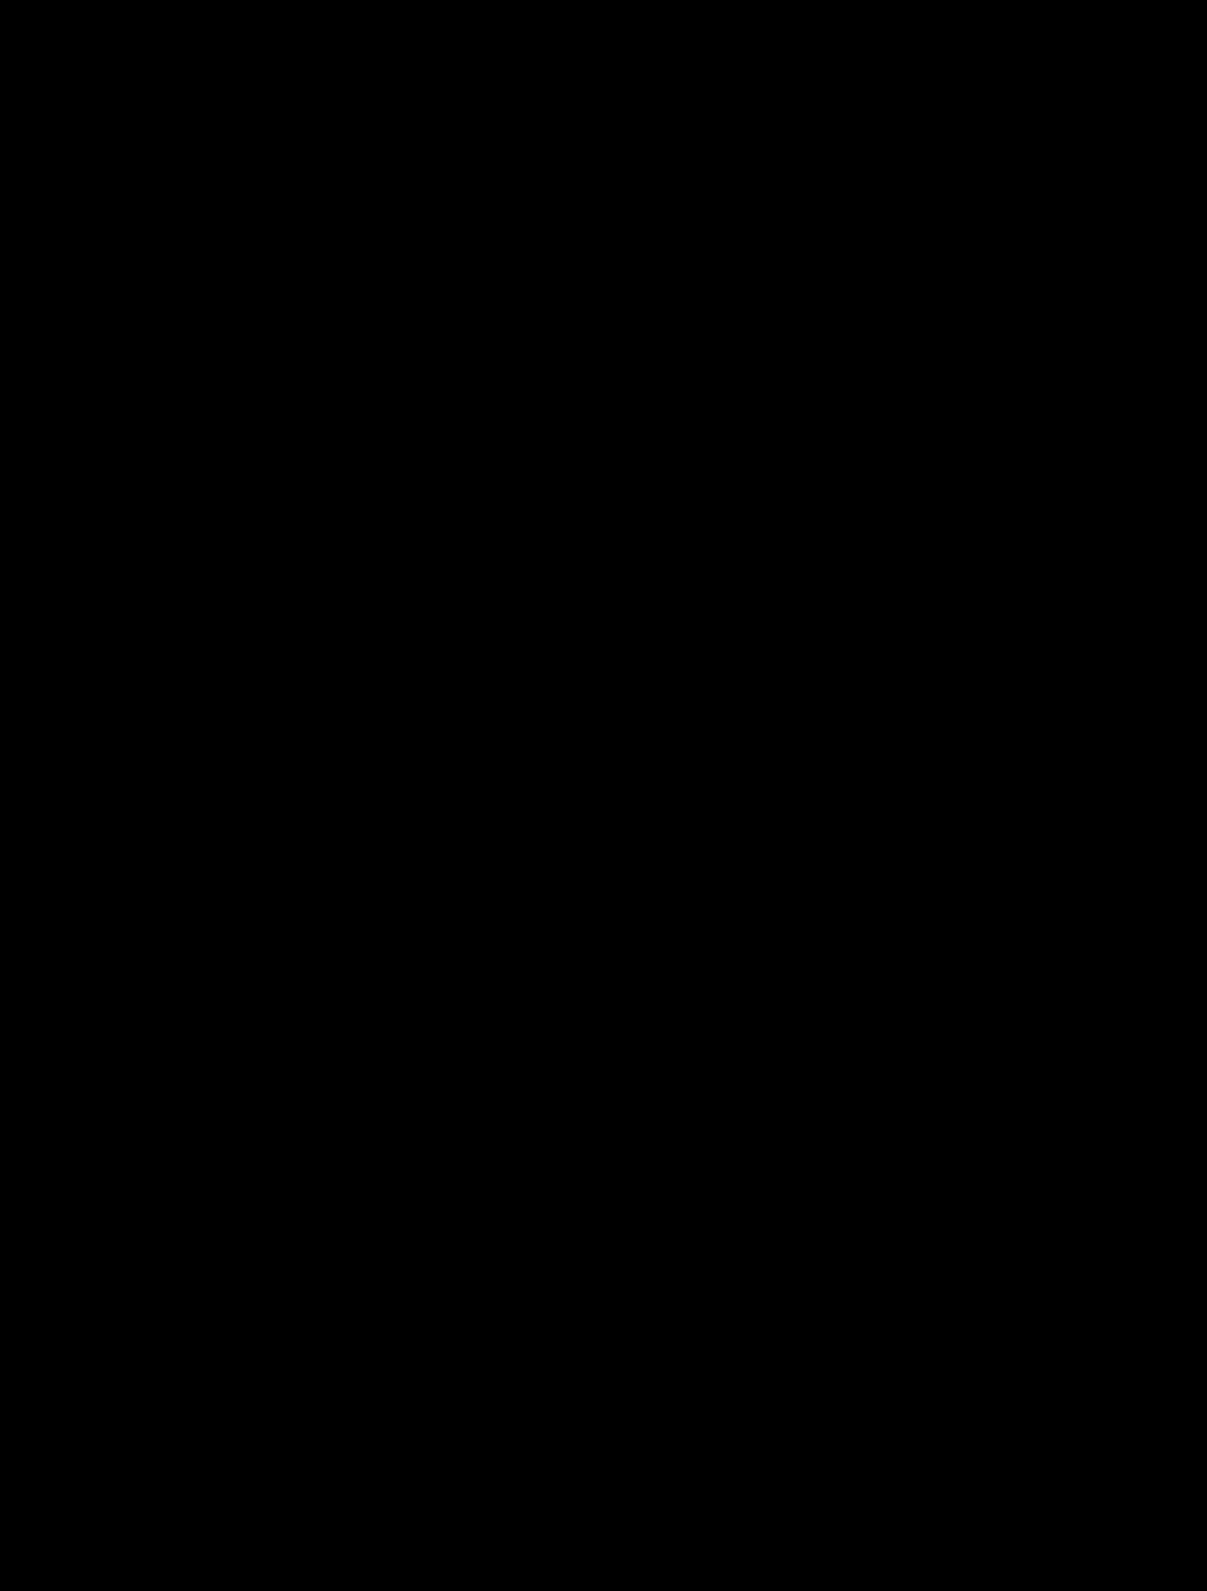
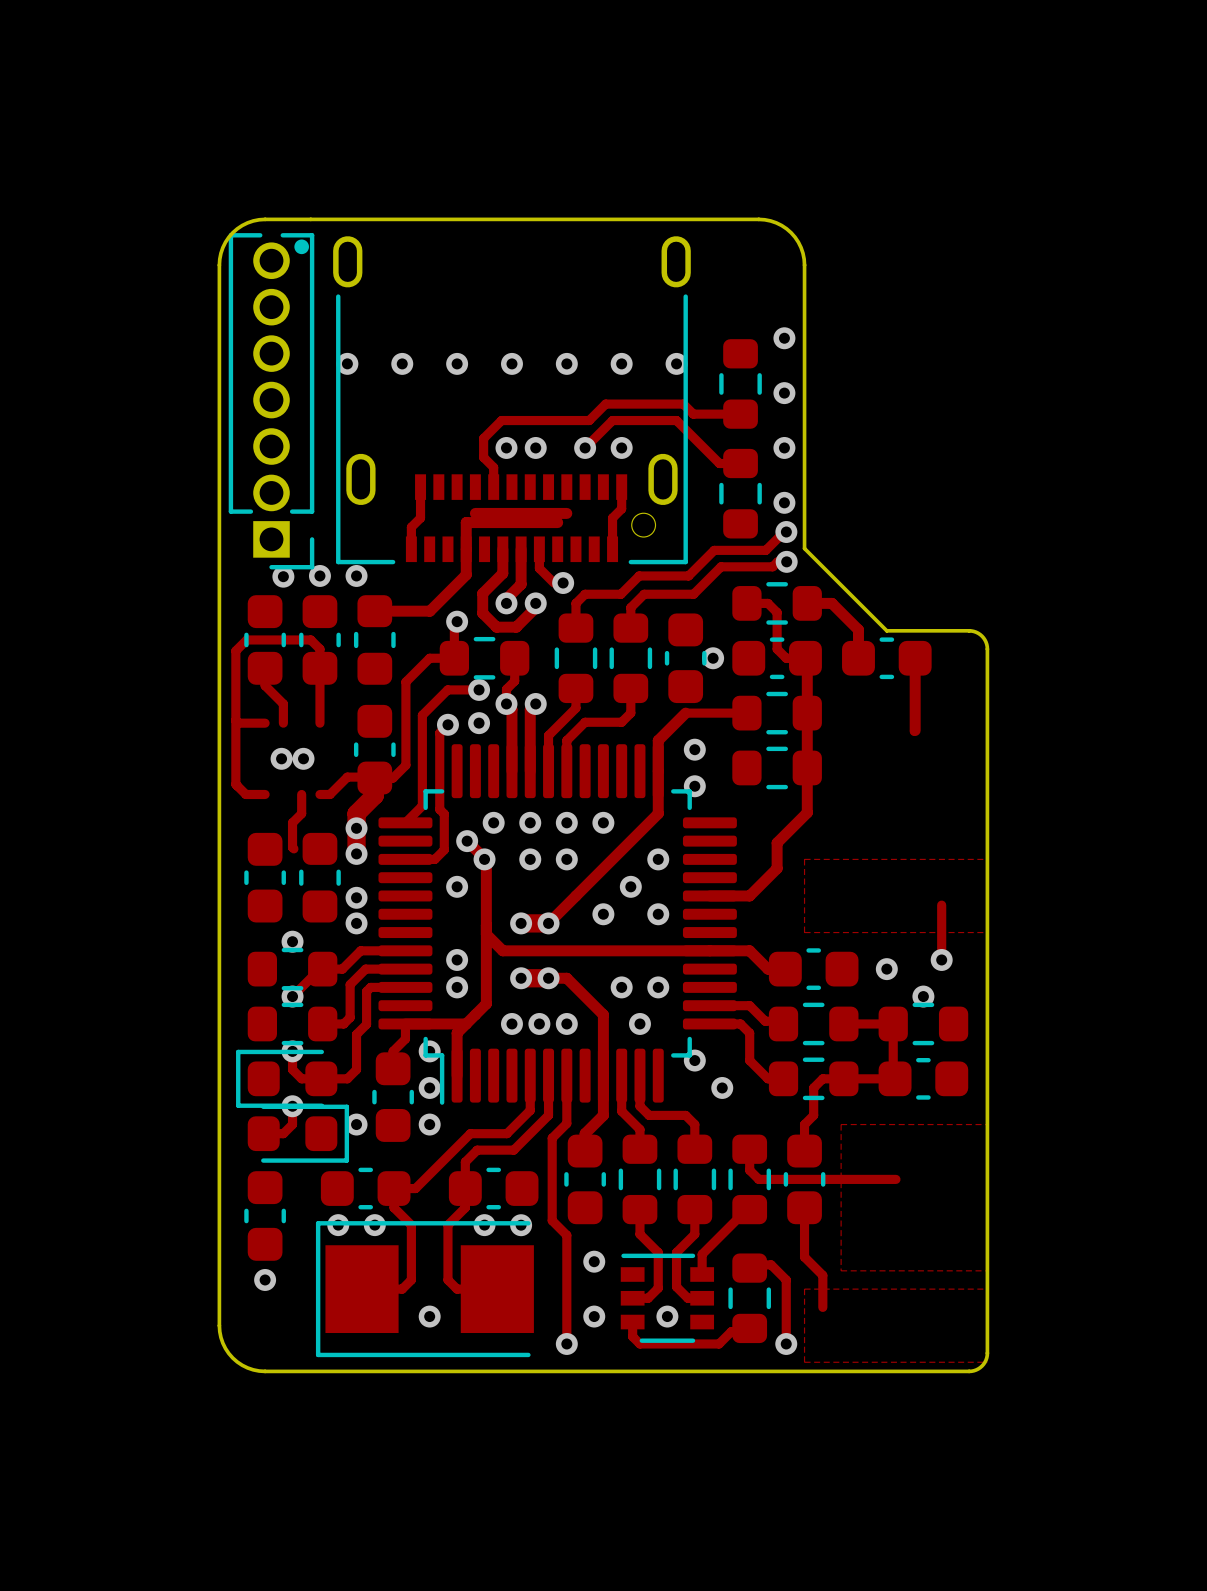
board edge: none -> (265, 219) (758, 219) (770, 220) (781, 225) (791, 232) (798, 242) (802, 253) (804, 265) (804, 548) (886, 630) (971, 630) (982, 636) (987, 646) (987, 1353) (984, 1362) (978, 1368) (969, 1371) (265, 1371) (253, 1369) (242, 1365) (232, 1358) (225, 1348) (220, 1337) (219, 1325) (219, 265) (222, 247) (232, 232) (247, 222) (265, 219)
drawing: none -> [294, 239, 309, 255]
via: none -> (784, 338)
via: none -> (347, 363)
via: none -> (402, 363)
via: none -> (457, 363)
via: none -> (511, 363)
via: none -> (566, 363)
via: none -> (621, 363)
via: none -> (676, 363)
part: none -> (740, 383)
via: none -> (784, 393)
part: none -> (511, 400)
part: none -> (271, 401)
track: none -> (740, 414) (693, 414) (683, 404) (605, 404) (589, 420) (501, 420) (483, 438) (483, 457) (493, 467) (493, 487)
via: none -> (506, 447)
via: none -> (535, 447)
track: none -> (585, 447) (612, 420) (676, 420) (719, 463) (740, 463)
via: none -> (585, 447)
via: none -> (621, 447)
via: none -> (784, 447)
track: none -> (420, 487) (420, 518) (411, 527) (411, 549)
track: none -> (621, 487) (621, 508) (612, 518) (612, 549)
part: none -> (740, 493)
via: none -> (784, 502)
track: none -> (475, 513) (566, 513)
track: none -> (557, 522) (466, 522) (466, 574) (429, 611) (393, 611)
track: none -> (786, 532) (765, 550) (714, 550) (688, 575) (639, 575) (620, 594) (585, 594) (575, 603) (575, 624)
via: none -> (786, 532)
track: none -> (502, 549) (502, 573) (482, 593) (482, 613) (496, 627) (516, 627) (535, 607) (535, 603)
track: none -> (521, 549) (521, 584) (506, 599) (506, 603)
track: none -> (539, 549) (539, 568) (554, 583)
track: none -> (786, 561) (777, 561) (772, 566) (721, 566) (693, 594) (644, 594) (630, 607) (630, 624)
via: none -> (786, 561)
via: none -> (319, 575)
via: none -> (356, 575)
via: none -> (283, 576)
via: none -> (563, 583)
via: none -> (506, 603)
via: none -> (535, 603)
track: none -> (746, 603) (767, 603) (777, 612) (777, 649) (786, 658) (805, 658) (807, 660) (807, 812) (777, 842) (777, 868) (749, 895) (709, 895)
part: none -> (777, 603)
track: none -> (807, 603) (831, 603) (858, 629) (858, 658)
track: none -> (457, 621) (454, 624) (454, 658) (429, 658) (405, 682) (405, 765) (393, 778) (374, 778)
via: none -> (457, 621)
part: none -> (265, 639)
part: none -> (319, 639)
part: none -> (374, 639)
part: none -> (484, 658)
track: none -> (514, 658) (514, 681) (506, 689) (506, 703) (511, 709) (511, 771)
part: none -> (575, 658)
part: none -> (630, 658)
part: none -> (685, 658)
via: none -> (713, 658)
part: none -> (777, 658)
part: none -> (886, 658)
track: none -> (915, 658) (914, 731)
track: none -> (265, 668) (265, 685) (283, 703) (283, 723)
track: none -> (479, 689) (447, 689) (422, 715) (422, 805) (405, 822)
via: none -> (479, 689)
track: none -> (575, 691) (575, 708) (548, 735) (548, 771)
track: none -> (630, 691) (630, 713) (621, 722) (585, 722) (566, 740) (566, 771)
via: none -> (506, 703)
track: none -> (535, 703) (530, 709) (530, 771)
via: none -> (535, 703)
track: none -> (746, 713) (685, 713) (658, 740) (658, 813) (548, 923) (521, 923)
part: none -> (777, 713)
track: none -> (235, 720) (238, 723) (265, 723)
track: none -> (319, 723) (319, 649) (310, 639) (246, 639) (235, 650) (235, 784) (245, 794) (265, 794)
via: none -> (479, 723)
track: none -> (447, 724) (439, 733) (439, 809) (444, 814) (444, 849) (434, 859) (405, 859)
via: none -> (447, 724)
part: none -> (374, 749)
via: none -> (694, 749)
via: none -> (281, 758)
via: none -> (303, 758)
part: none -> (777, 767)
track: none -> (374, 778) (347, 777) (330, 794) (319, 794)
track: none -> (374, 778) (374, 795) (356, 813) (356, 853)
via: none -> (694, 786)
track: none -> (301, 794) (301, 813) (292, 822) (293, 848)
via: none -> (493, 822)
via: none -> (530, 822)
via: none -> (566, 822)
via: none -> (603, 822)
via: none -> (356, 828)
track: none -> (467, 841) (486, 860) (486, 1003) (457, 1033) (457, 1075)
via: none -> (467, 841)
via: none -> (356, 853)
via: none -> (484, 859)
via: none -> (530, 859)
via: none -> (566, 859)
via: none -> (658, 859)
zone outline: none -> (987, 859) (804, 859) (804, 932) (987, 932)
part: none -> (265, 877)
part: none -> (319, 877)
via: none -> (457, 886)
via: none -> (630, 886)
via: none -> (356, 897)
track: none -> (941, 905) (941, 959)
via: none -> (603, 914)
via: none -> (658, 914)
via: none -> (356, 923)
via: none -> (521, 923)
via: none -> (548, 923)
part: none -> (557, 924)
track: none -> (486, 934) (502, 950) (749, 950) (767, 969) (785, 969)
via: none -> (292, 941)
track: none -> (405, 950) (360, 950) (342, 969) (319, 969) (292, 996)
via: none -> (457, 959)
via: none -> (941, 959)
part: none -> (292, 969)
track: none -> (405, 969) (365, 969) (350, 984) (350, 1017) (343, 1023) (322, 1023)
part: none -> (813, 969)
via: none -> (886, 969)
track: none -> (521, 978) (566, 978) (603, 1014) (603, 1115) (585, 1133) (585, 1147)
via: none -> (521, 978)
via: none -> (548, 978)
track: none -> (405, 987) (370, 987) (366, 991) (366, 1024) (356, 1034) (356, 1069) (347, 1078) (301, 1078) (292, 1069) (292, 1051)
via: none -> (457, 987)
via: none -> (621, 987)
via: none -> (658, 987)
via: none -> (292, 996)
via: none -> (923, 996)
track: none -> (709, 1005) (749, 1005) (765, 1021) (786, 1021)
part: none -> (292, 1023)
track: none -> (466, 1023) (405, 1023) (405, 1039) (393, 1051) (393, 1068)
via: none -> (511, 1023)
via: none -> (539, 1023)
via: none -> (566, 1023)
via: none -> (639, 1023)
track: none -> (709, 1023) (740, 1023) (749, 1033) (749, 1060) (767, 1078) (783, 1078)
part: none -> (813, 1023)
track: none -> (843, 1023) (893, 1023) (893, 1077) (895, 1078) (822, 1078) (813, 1087) (813, 1115) (804, 1124) (804, 1151)
part: none -> (923, 1023)
via: none -> (292, 1051)
via: none -> (429, 1051)
via: none -> (694, 1060)
track: none -> (530, 1075) (530, 1110) (506, 1133) (470, 1133) (415, 1188) (401, 1188)
track: none -> (548, 1075) (548, 1115) (513, 1150) (477, 1150) (465, 1162) (465, 1207) (447, 1225) (447, 1279) (457, 1289) (497, 1289)
track: none -> (566, 1075) (566, 1123) (552, 1138) (552, 1220) (566, 1235) (566, 1343)
track: none -> (621, 1075) (621, 1111) (639, 1129) (639, 1149)
track: none -> (639, 1075) (639, 1106) (649, 1115) (685, 1115) (694, 1124) (694, 1146)
part: none -> (286, 1078)
part: none -> (813, 1078)
part: none -> (923, 1078)
via: none -> (429, 1087)
via: none -> (722, 1087)
part: none -> (393, 1097)
track: none -> (292, 1106) (292, 1124) (283, 1133) (263, 1133)
via: none -> (292, 1106)
via: none -> (356, 1124)
via: none -> (429, 1124)
zone outline: none -> (987, 1124) (841, 1124) (841, 1270) (987, 1270)
part: none -> (298, 1133)
track: none -> (749, 1146) (749, 1170) (758, 1179) (895, 1179)
part: none -> (585, 1179)
part: none -> (639, 1179)
part: none -> (694, 1179)
part: none -> (749, 1179)
part: none -> (804, 1179)
part: none -> (365, 1188)
track: none -> (403, 1188) (394, 1197) (394, 1207) (411, 1225) (411, 1279) (402, 1289) (362, 1289)
part: none -> (493, 1188)
track: none -> (804, 1207) (804, 1257) (822, 1275) (822, 1307)
track: none -> (639, 1209) (639, 1234) (658, 1252) (658, 1288) (648, 1298) (632, 1298)
track: none -> (694, 1209) (694, 1234) (676, 1252) (676, 1286) (687, 1298) (702, 1298)
track: none -> (749, 1209) (746, 1209) (702, 1254) (702, 1274)
part: none -> (265, 1215)
via: none -> (338, 1225)
via: none -> (374, 1225)
via: none -> (484, 1225)
via: none -> (521, 1225)
via: none -> (594, 1261)
track: none -> (749, 1264) (771, 1264) (786, 1279) (786, 1343)
via: none -> (265, 1279)
part: none -> (424, 1289)
zone outline: none -> (987, 1289) (804, 1289) (804, 1362) (987, 1362)
part: none -> (667, 1298)
part: none -> (749, 1298)
via: none -> (429, 1316)
via: none -> (594, 1316)
via: none -> (667, 1316)
track: none -> (632, 1322) (632, 1336) (639, 1343) (719, 1343) (731, 1331) (749, 1331)
via: none -> (566, 1343)
via: none -> (786, 1343)

